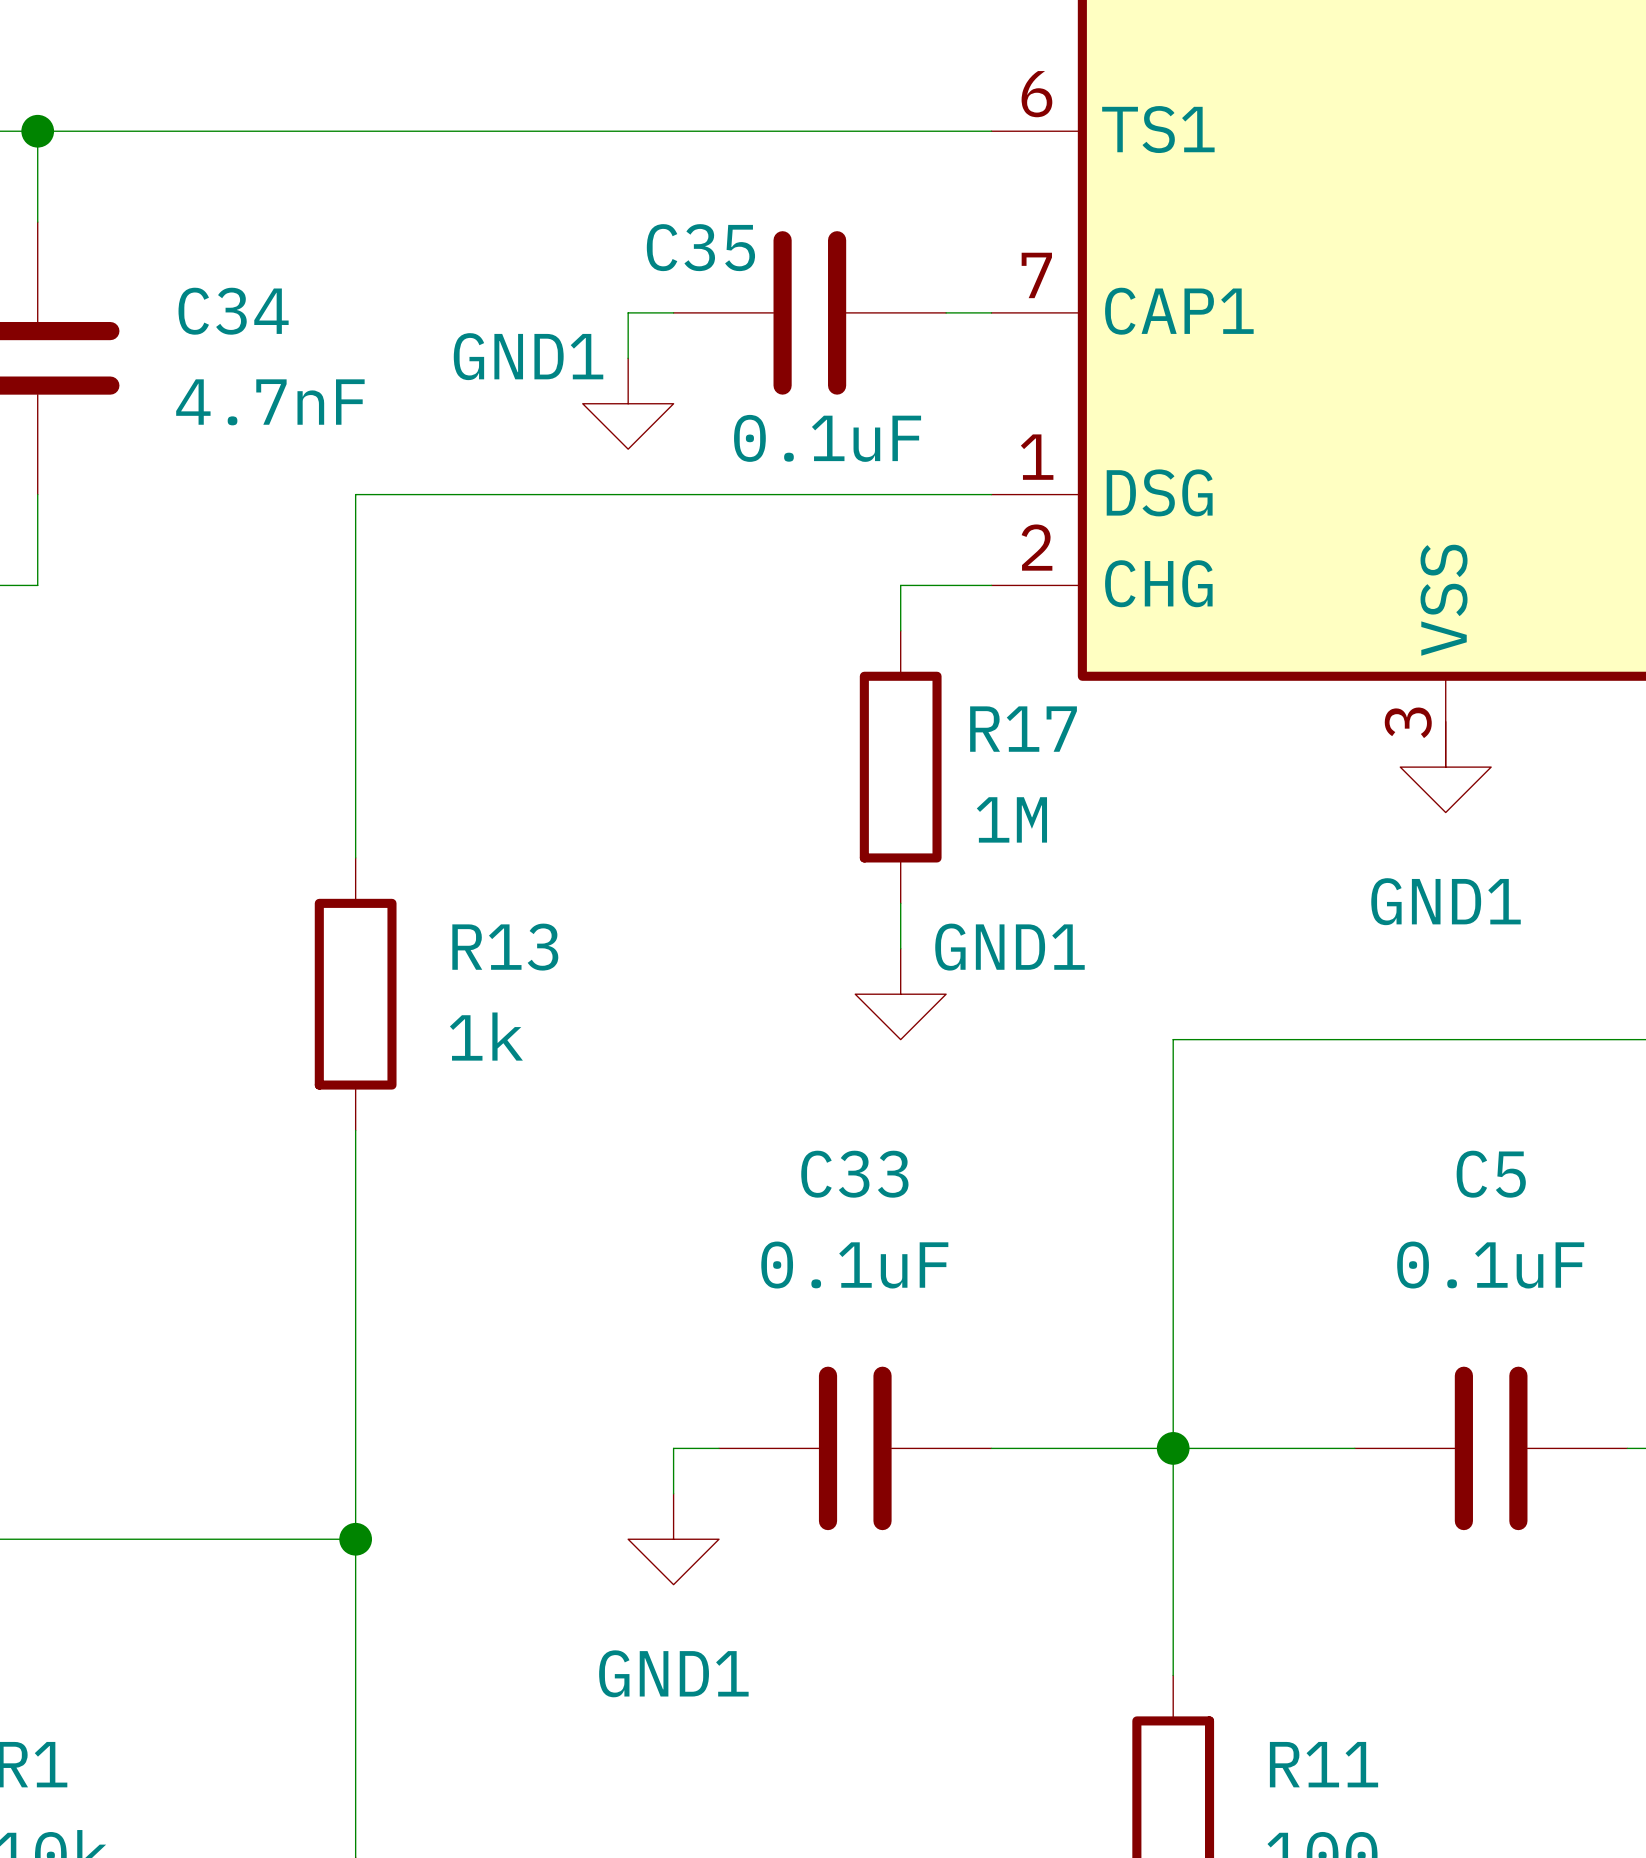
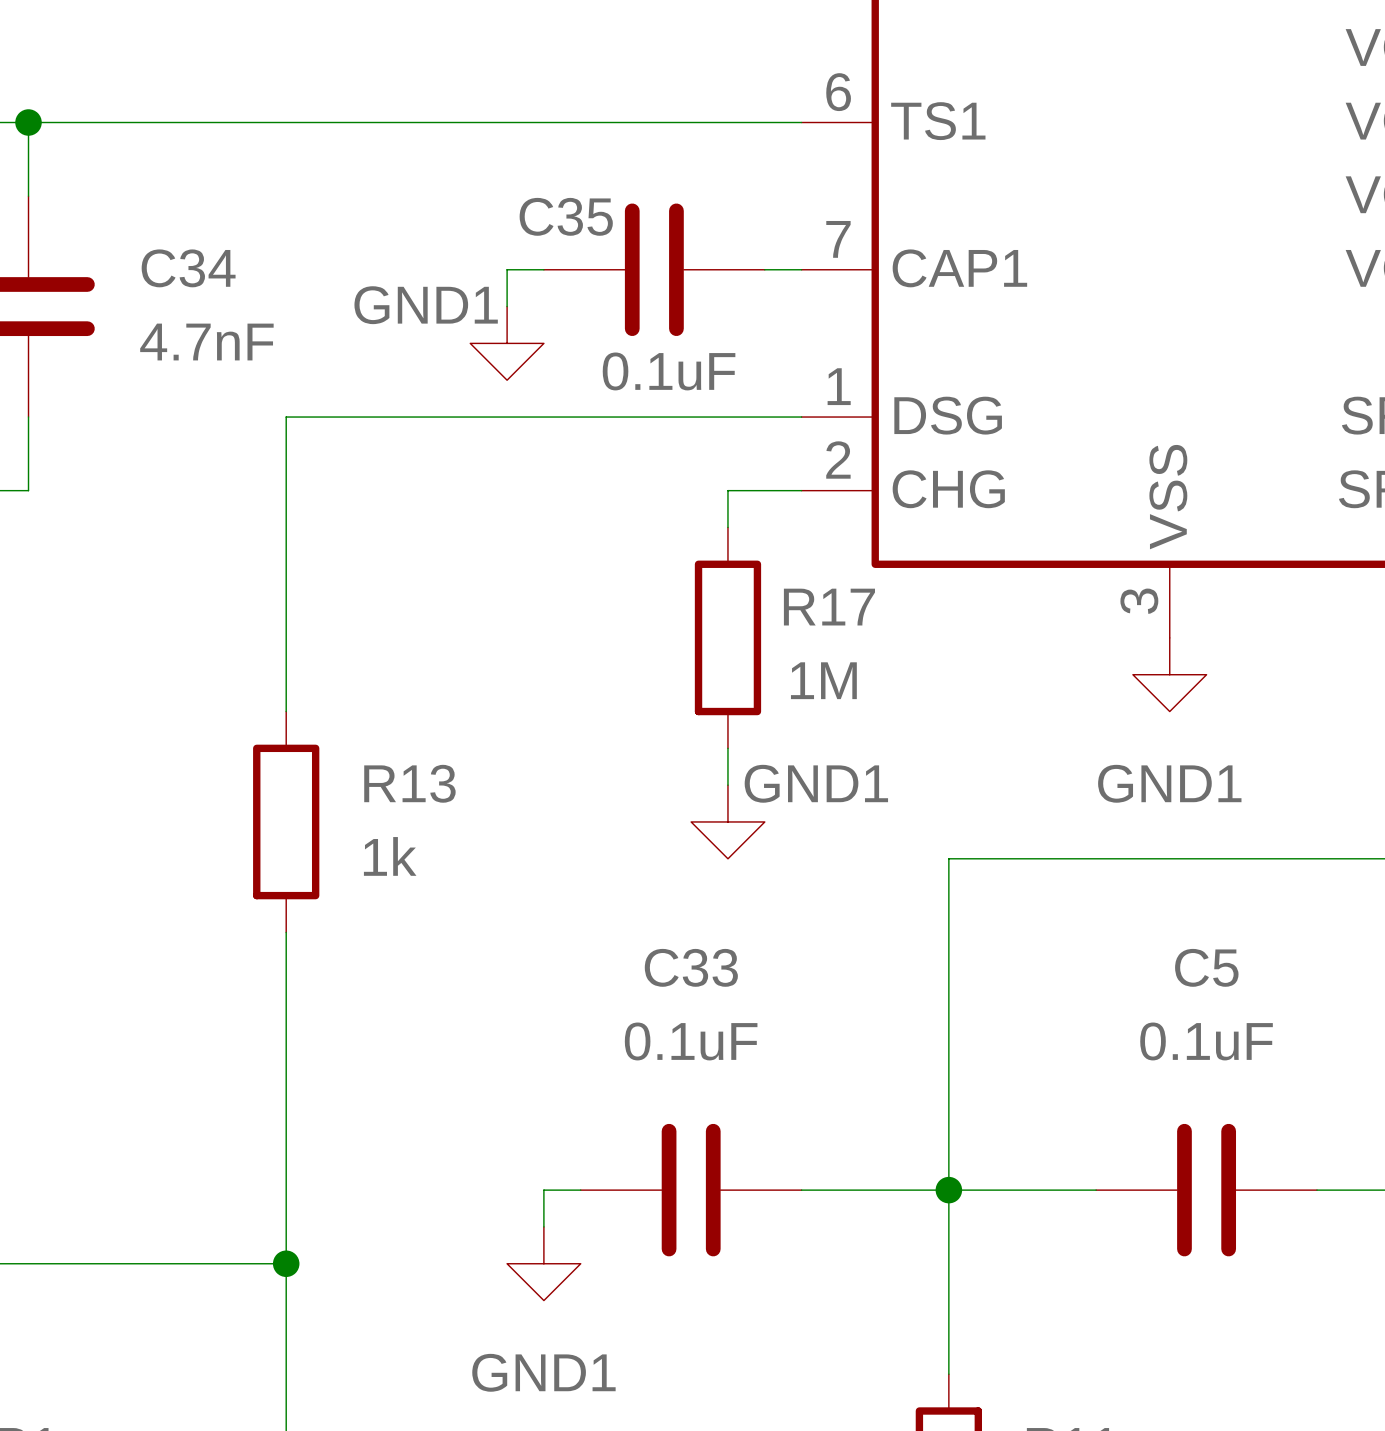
power symbol position: GND1 (1445, 767) -> GND1 (1169, 674)

